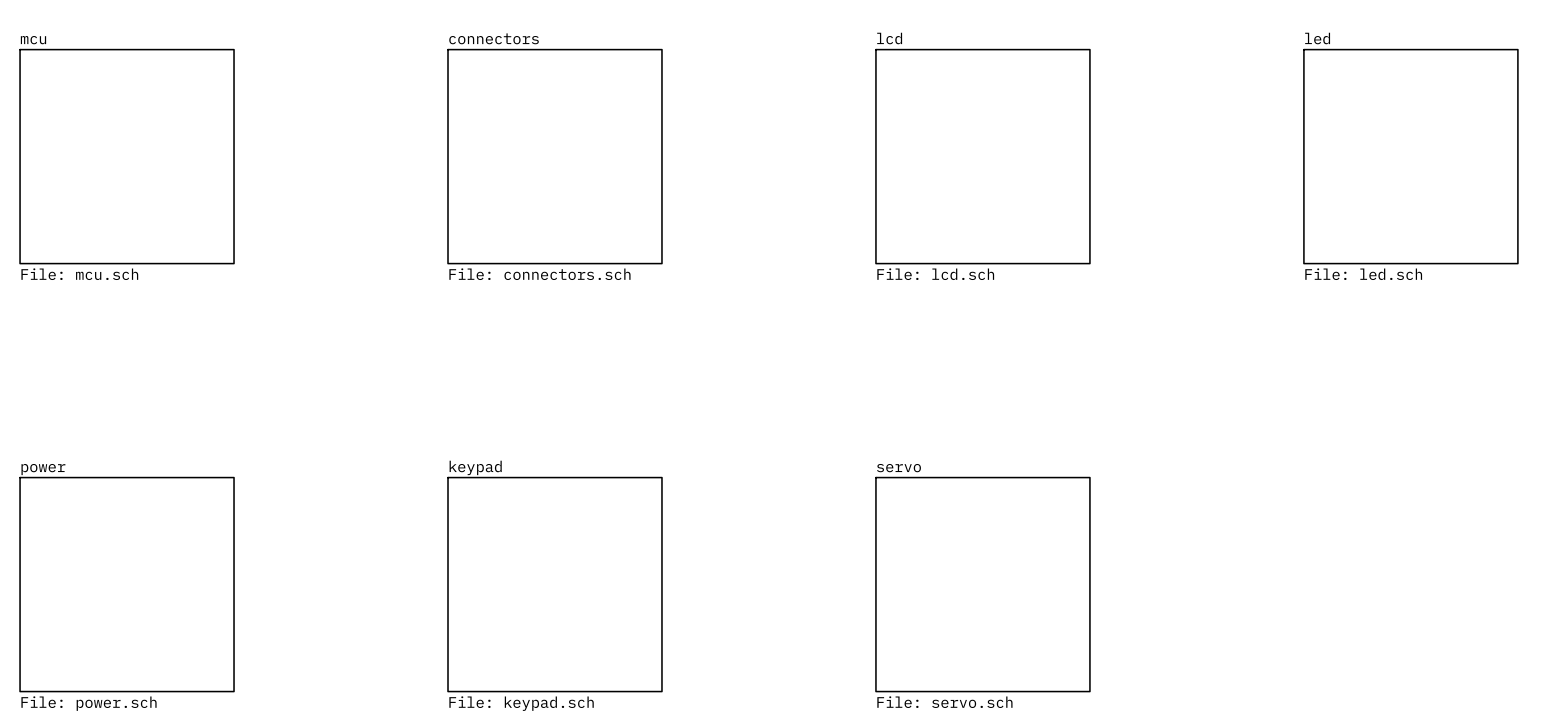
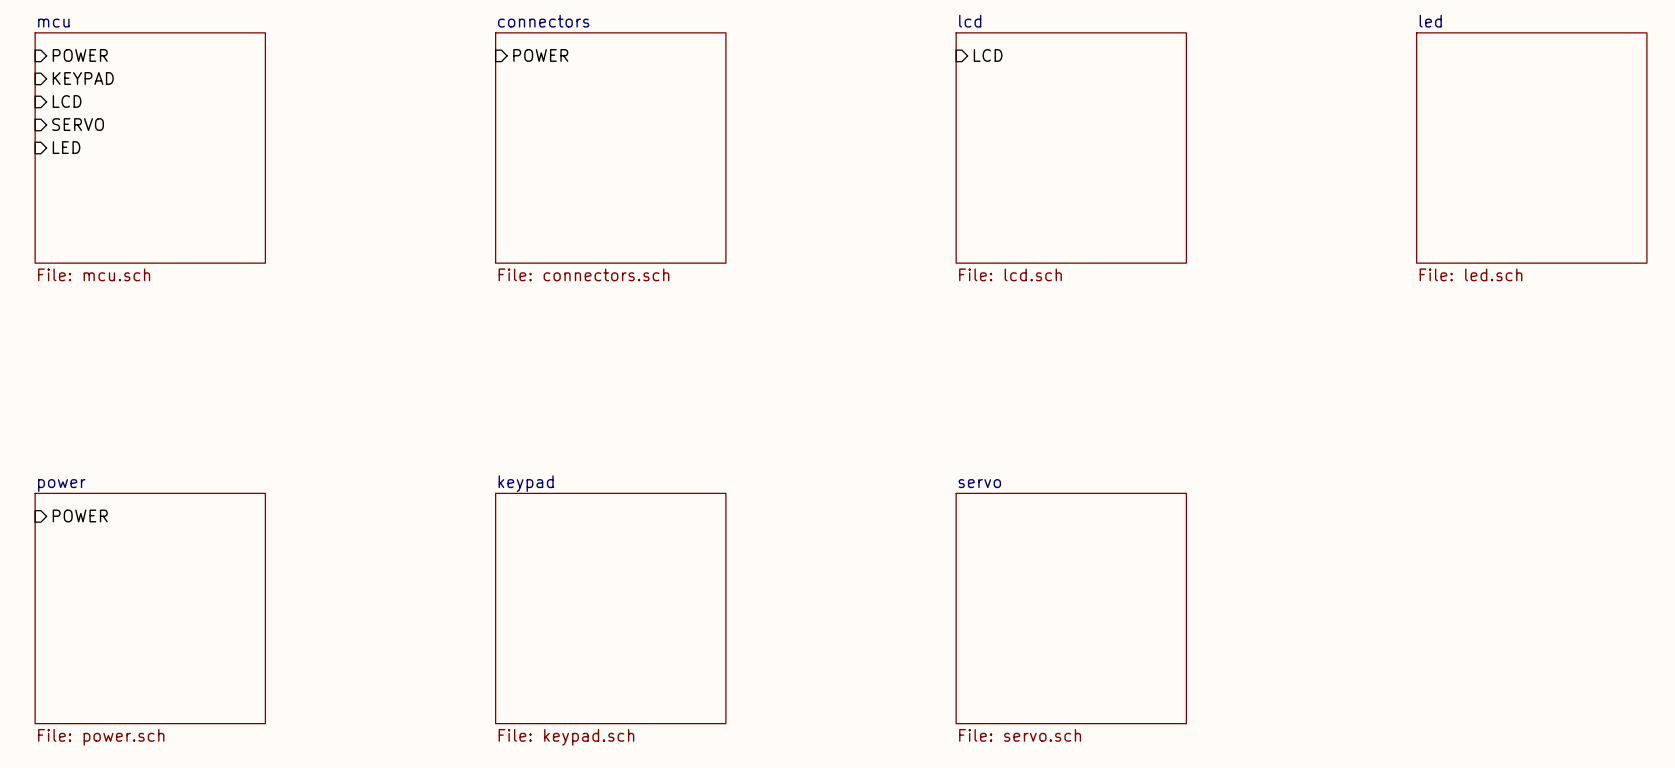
sheet pin: none -> POWER (80, 55)
sheet pin: none -> POWER (540, 55)
sheet pin: none -> LCD (988, 55)
sheet pin: none -> KEYPAD (83, 78)
sheet pin: none -> LCD (67, 101)
sheet pin: none -> SERVO (78, 124)
sheet pin: none -> LED (66, 147)
sheet pin: none -> POWER (80, 515)

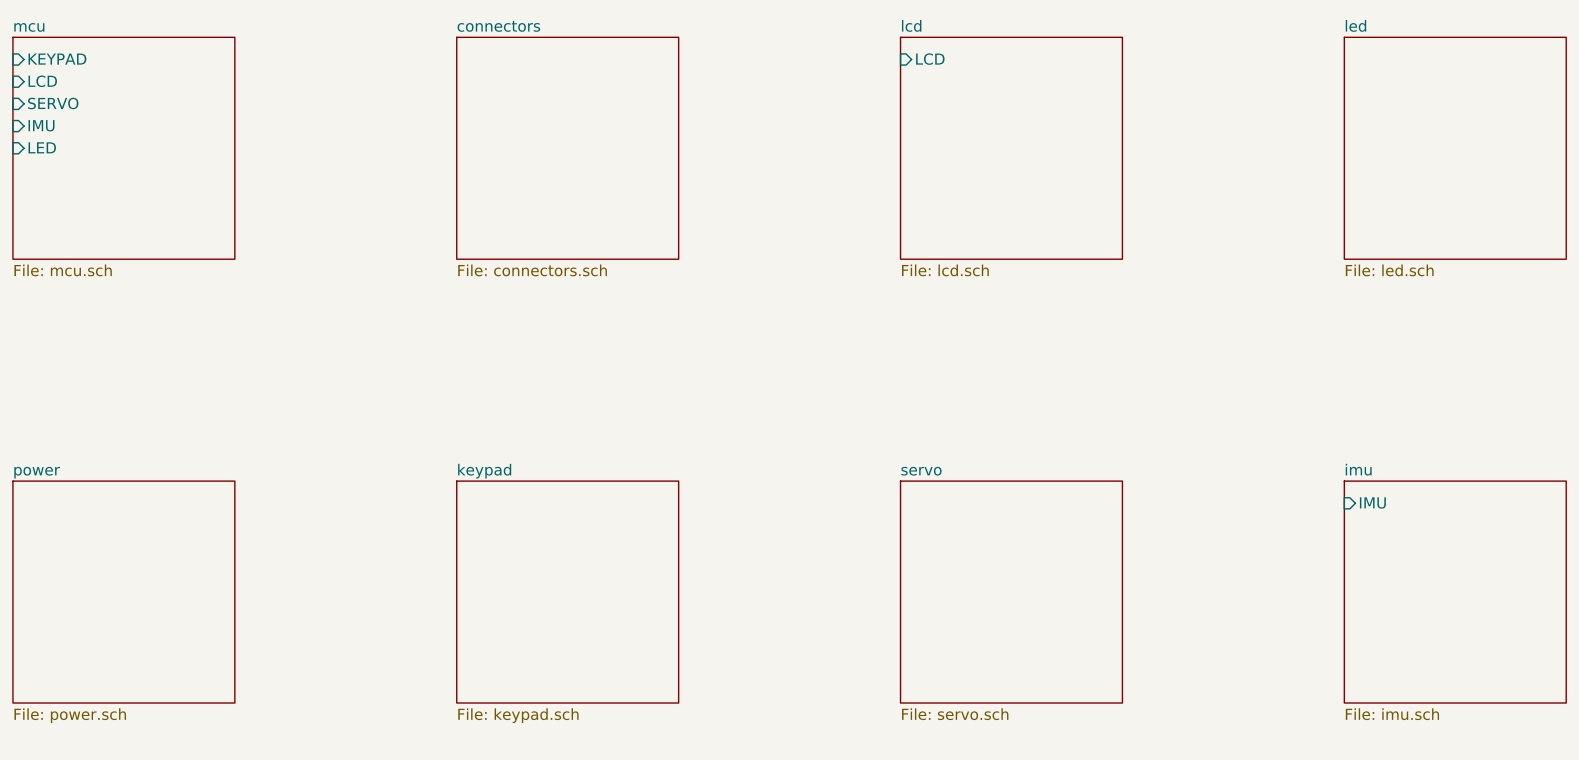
sheet pin: POWER (80, 55) -> KEYPAD (57, 59)
sheet pin: POWER (540, 55) -> none
sheet pin: KEYPAD (83, 78) -> LCD (42, 81)
sheet pin: LCD (67, 101) -> SERVO (53, 103)
sheet pin: SERVO (78, 124) -> IMU (41, 125)
sheet pin: POWER (80, 515) -> none
sheet pin: none -> IMU (1372, 502)
sheet imu: none -> File: imu.sch (1455, 592)

